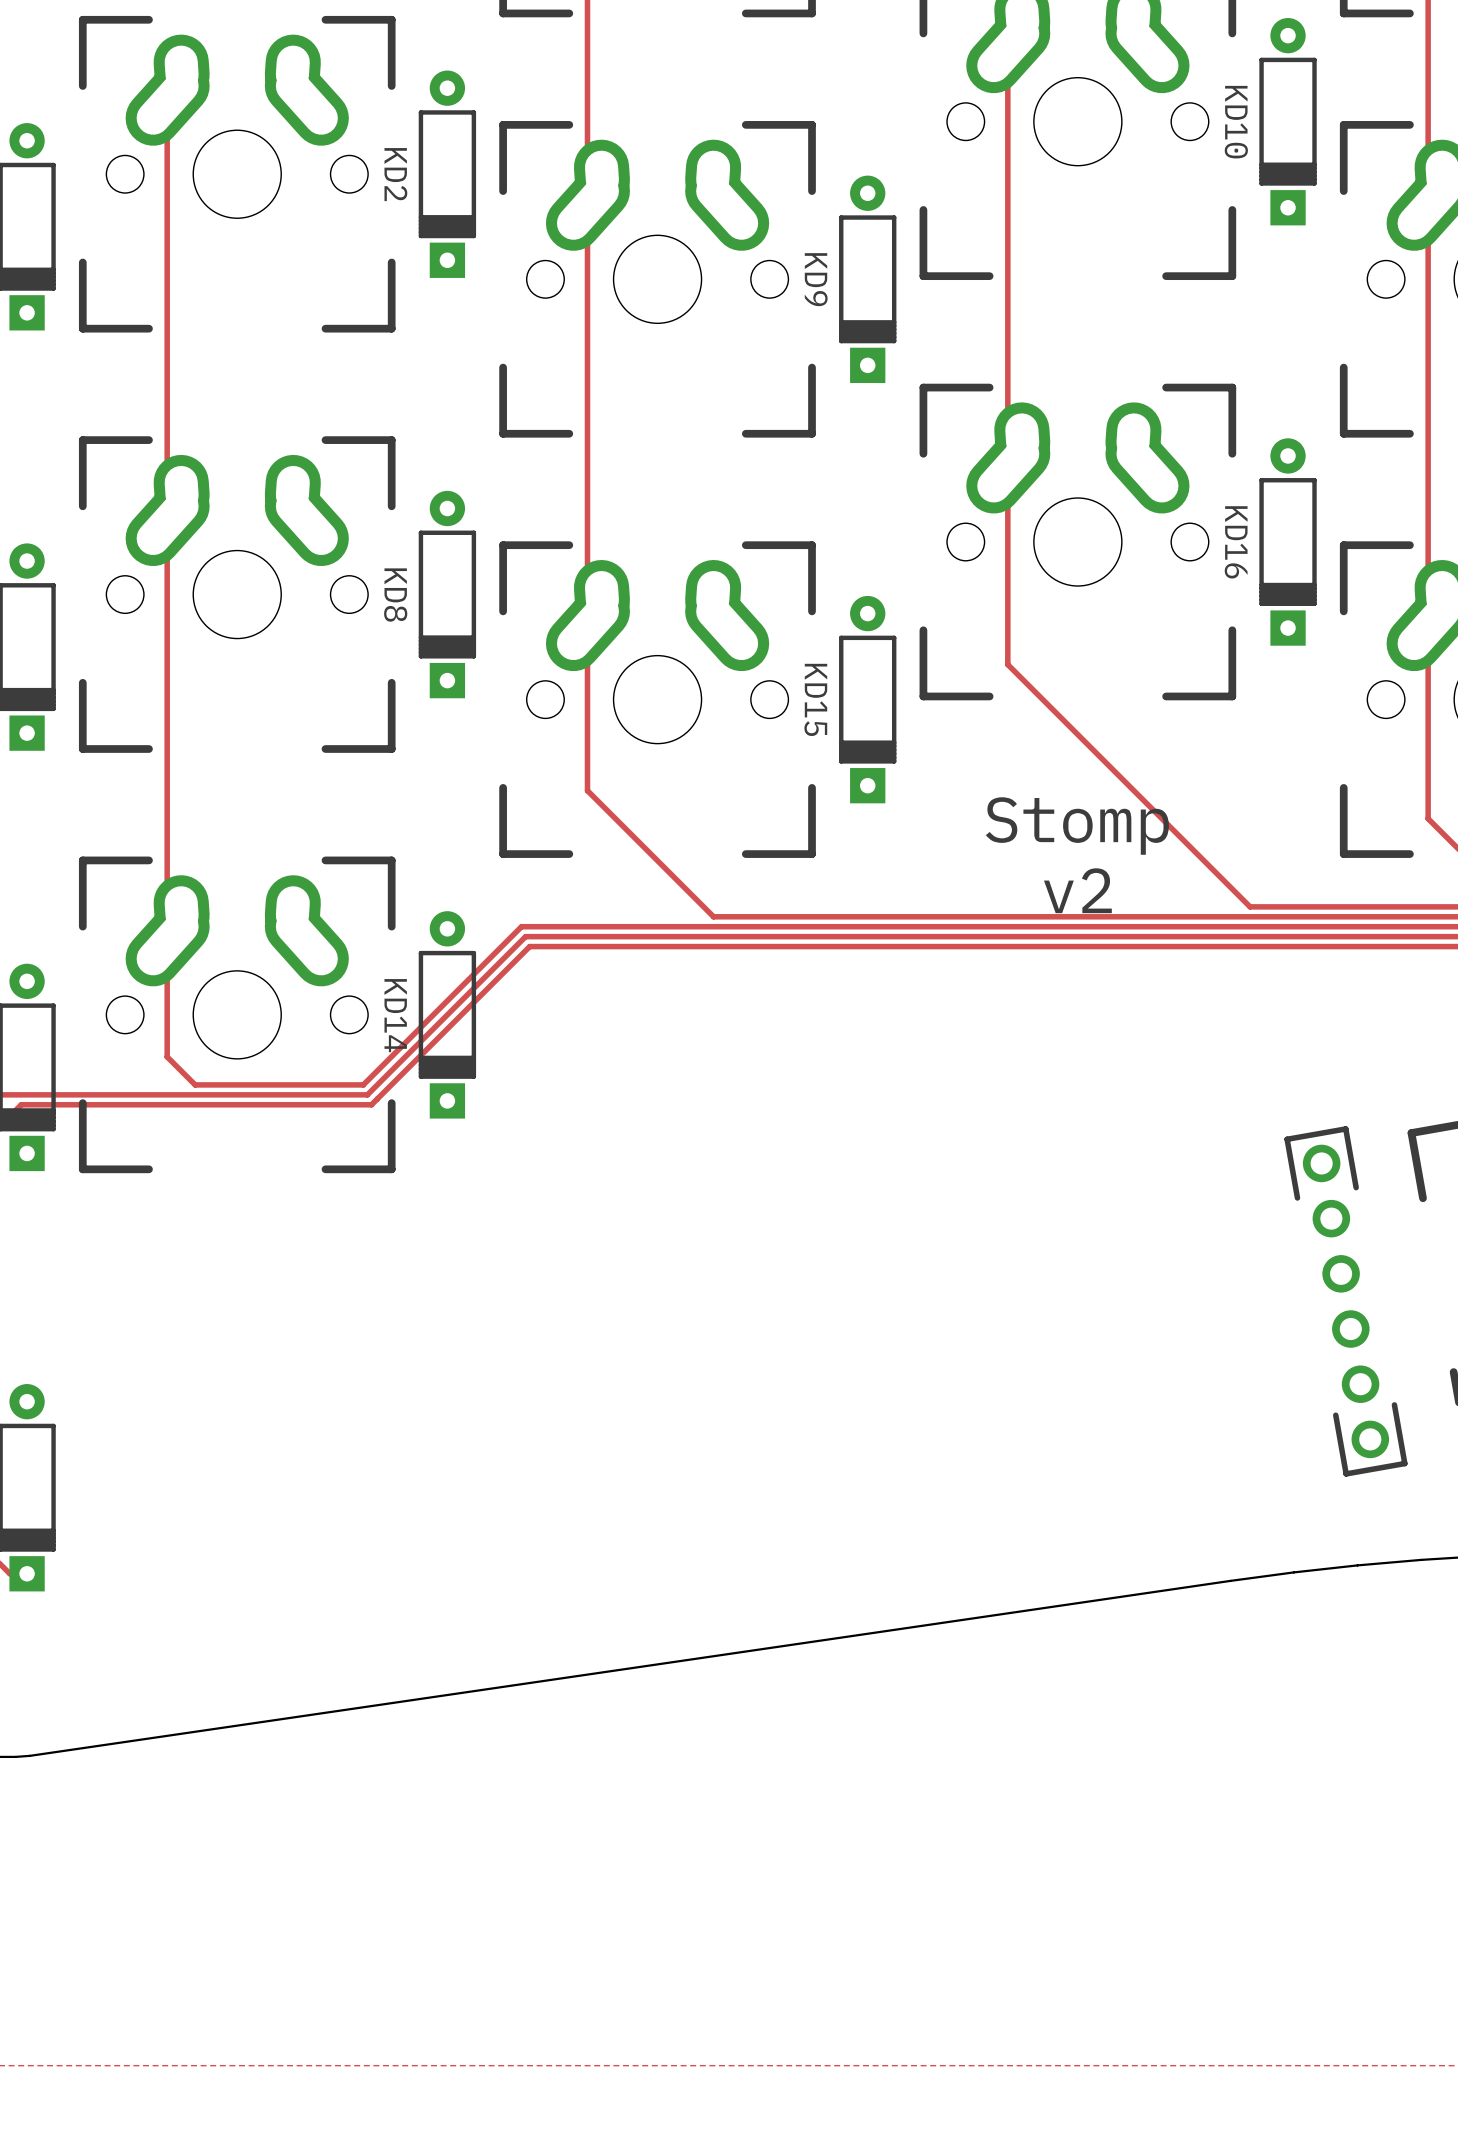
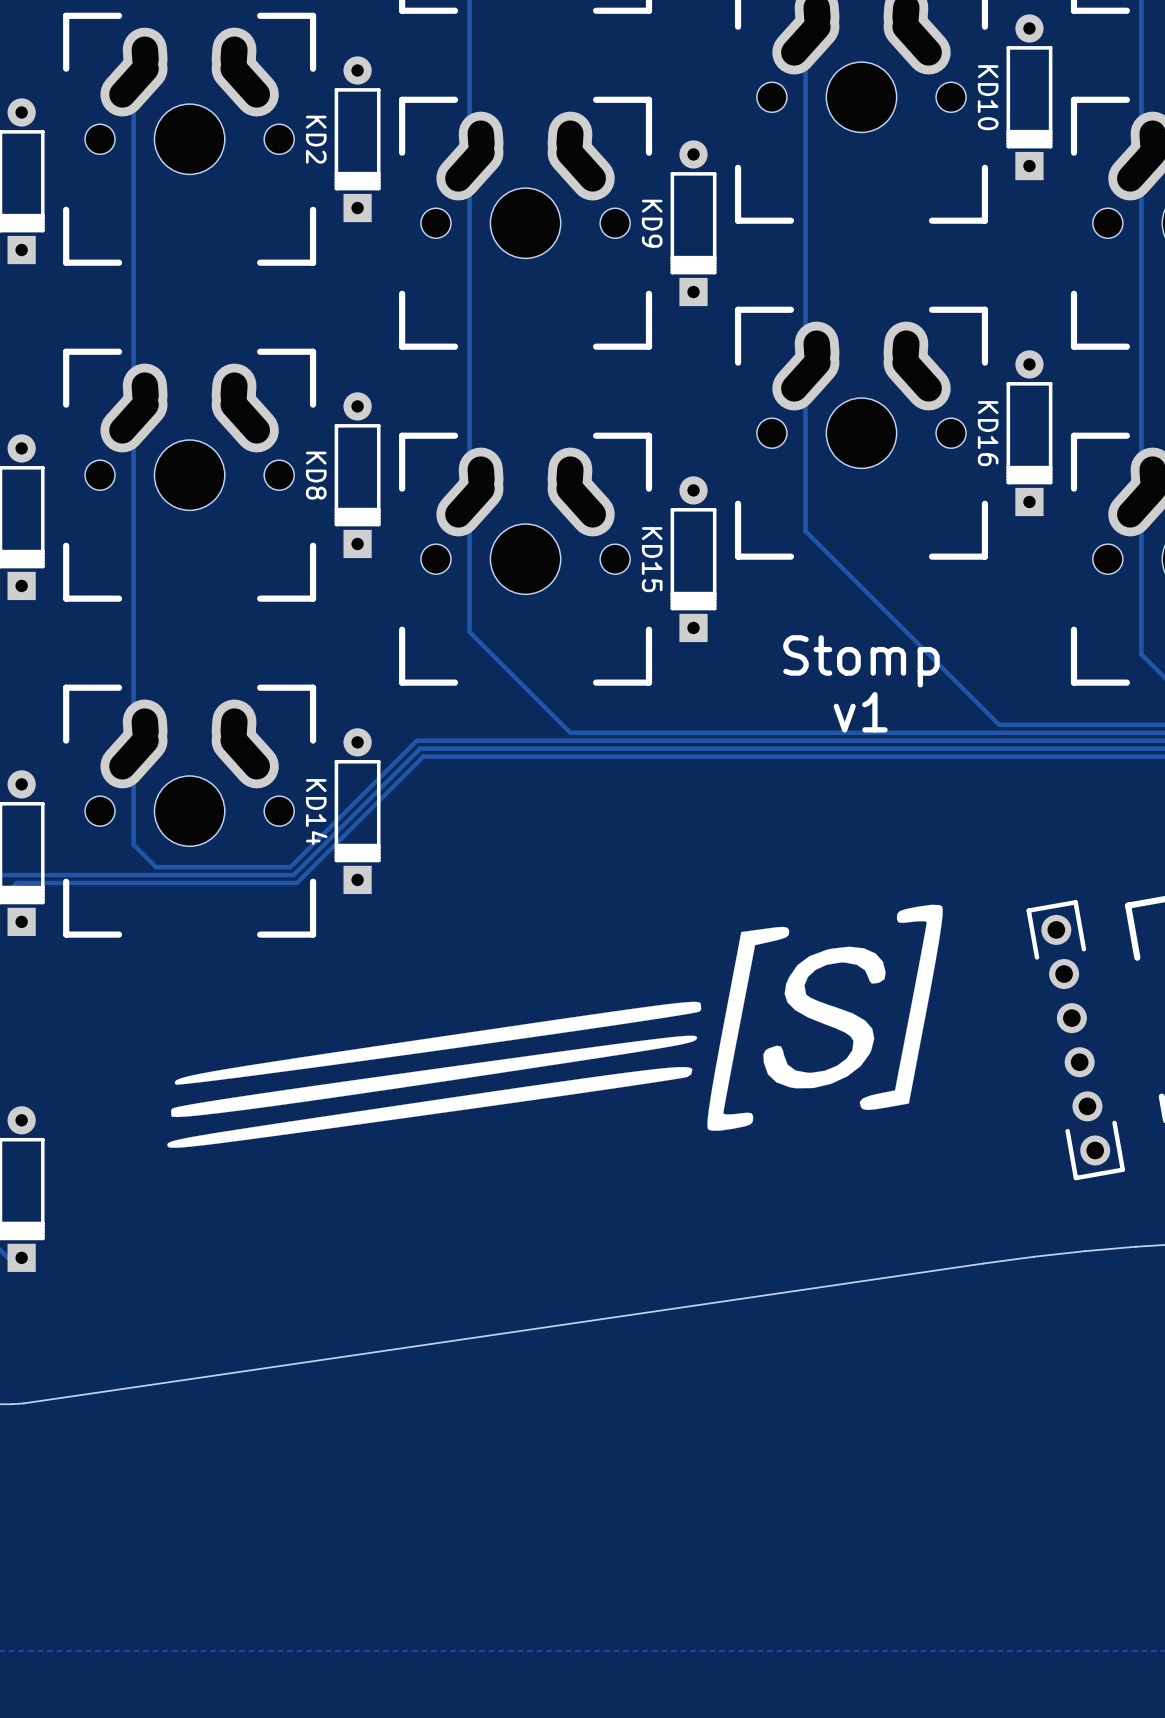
text: v2 (1077, 890) -> v1 (860, 712)
drawing: none -> [167, 904, 943, 1148]

